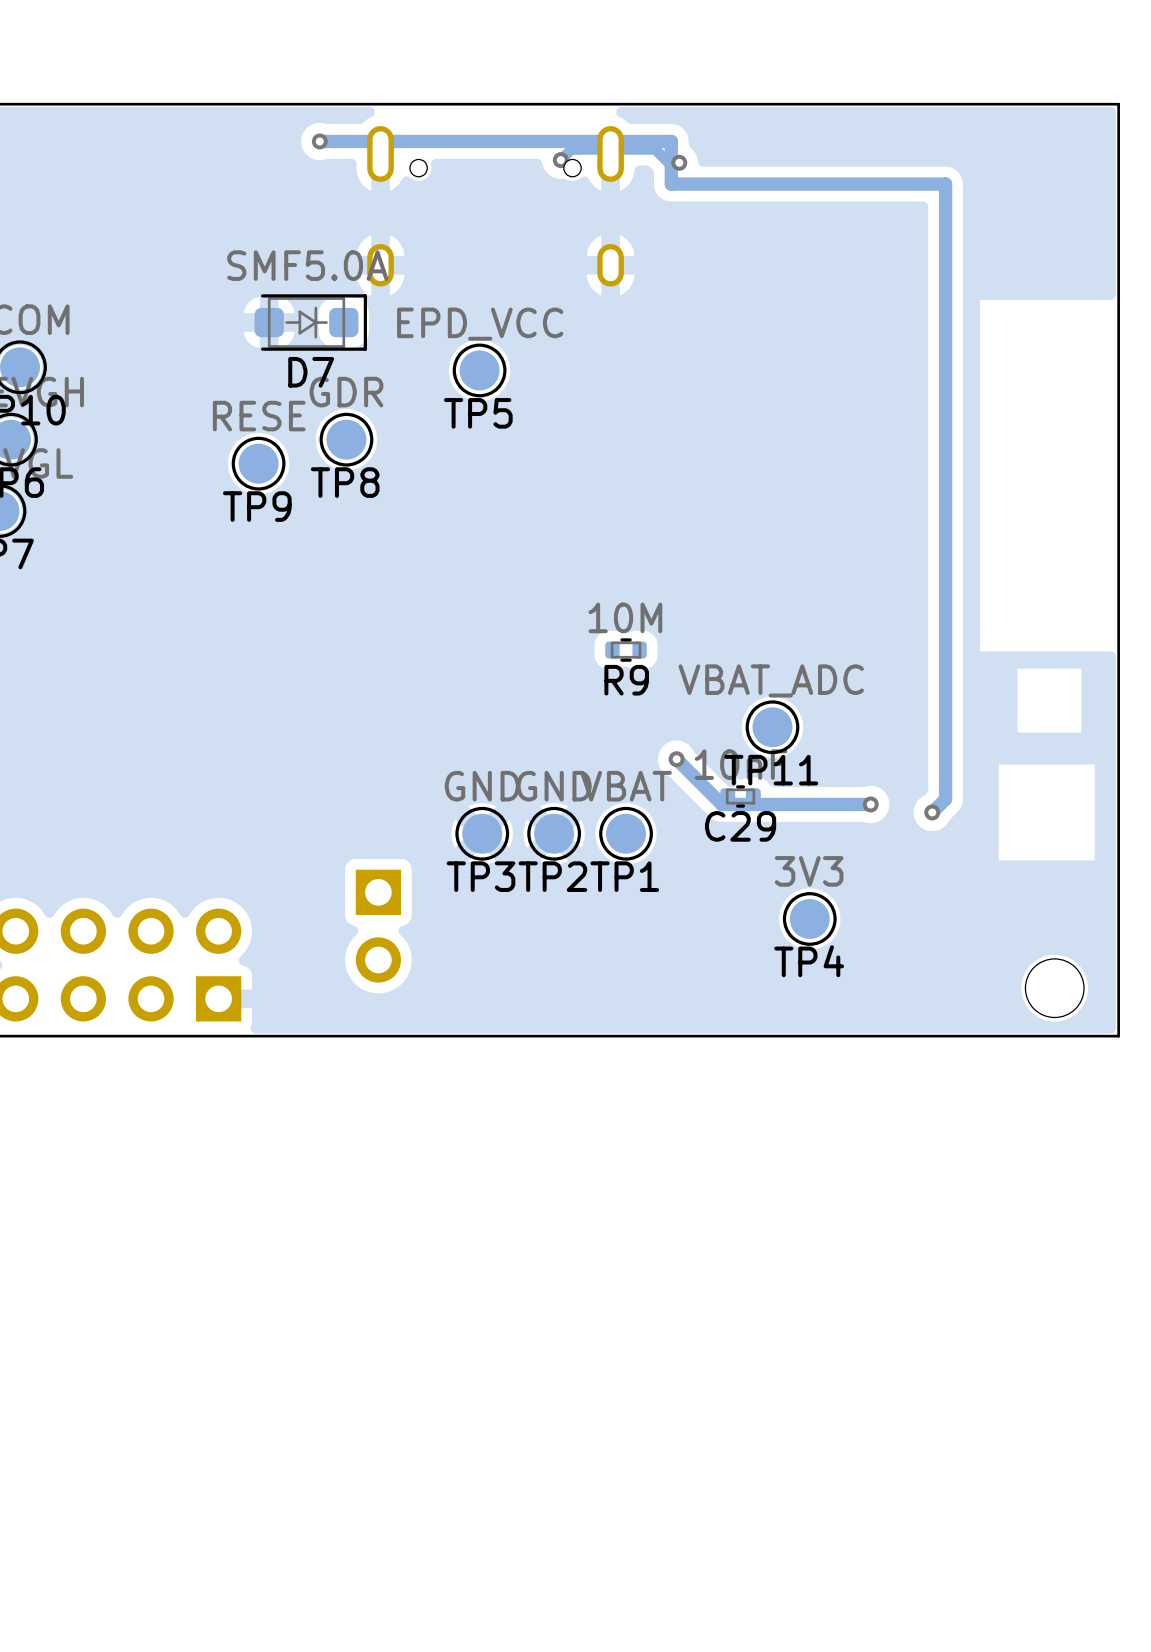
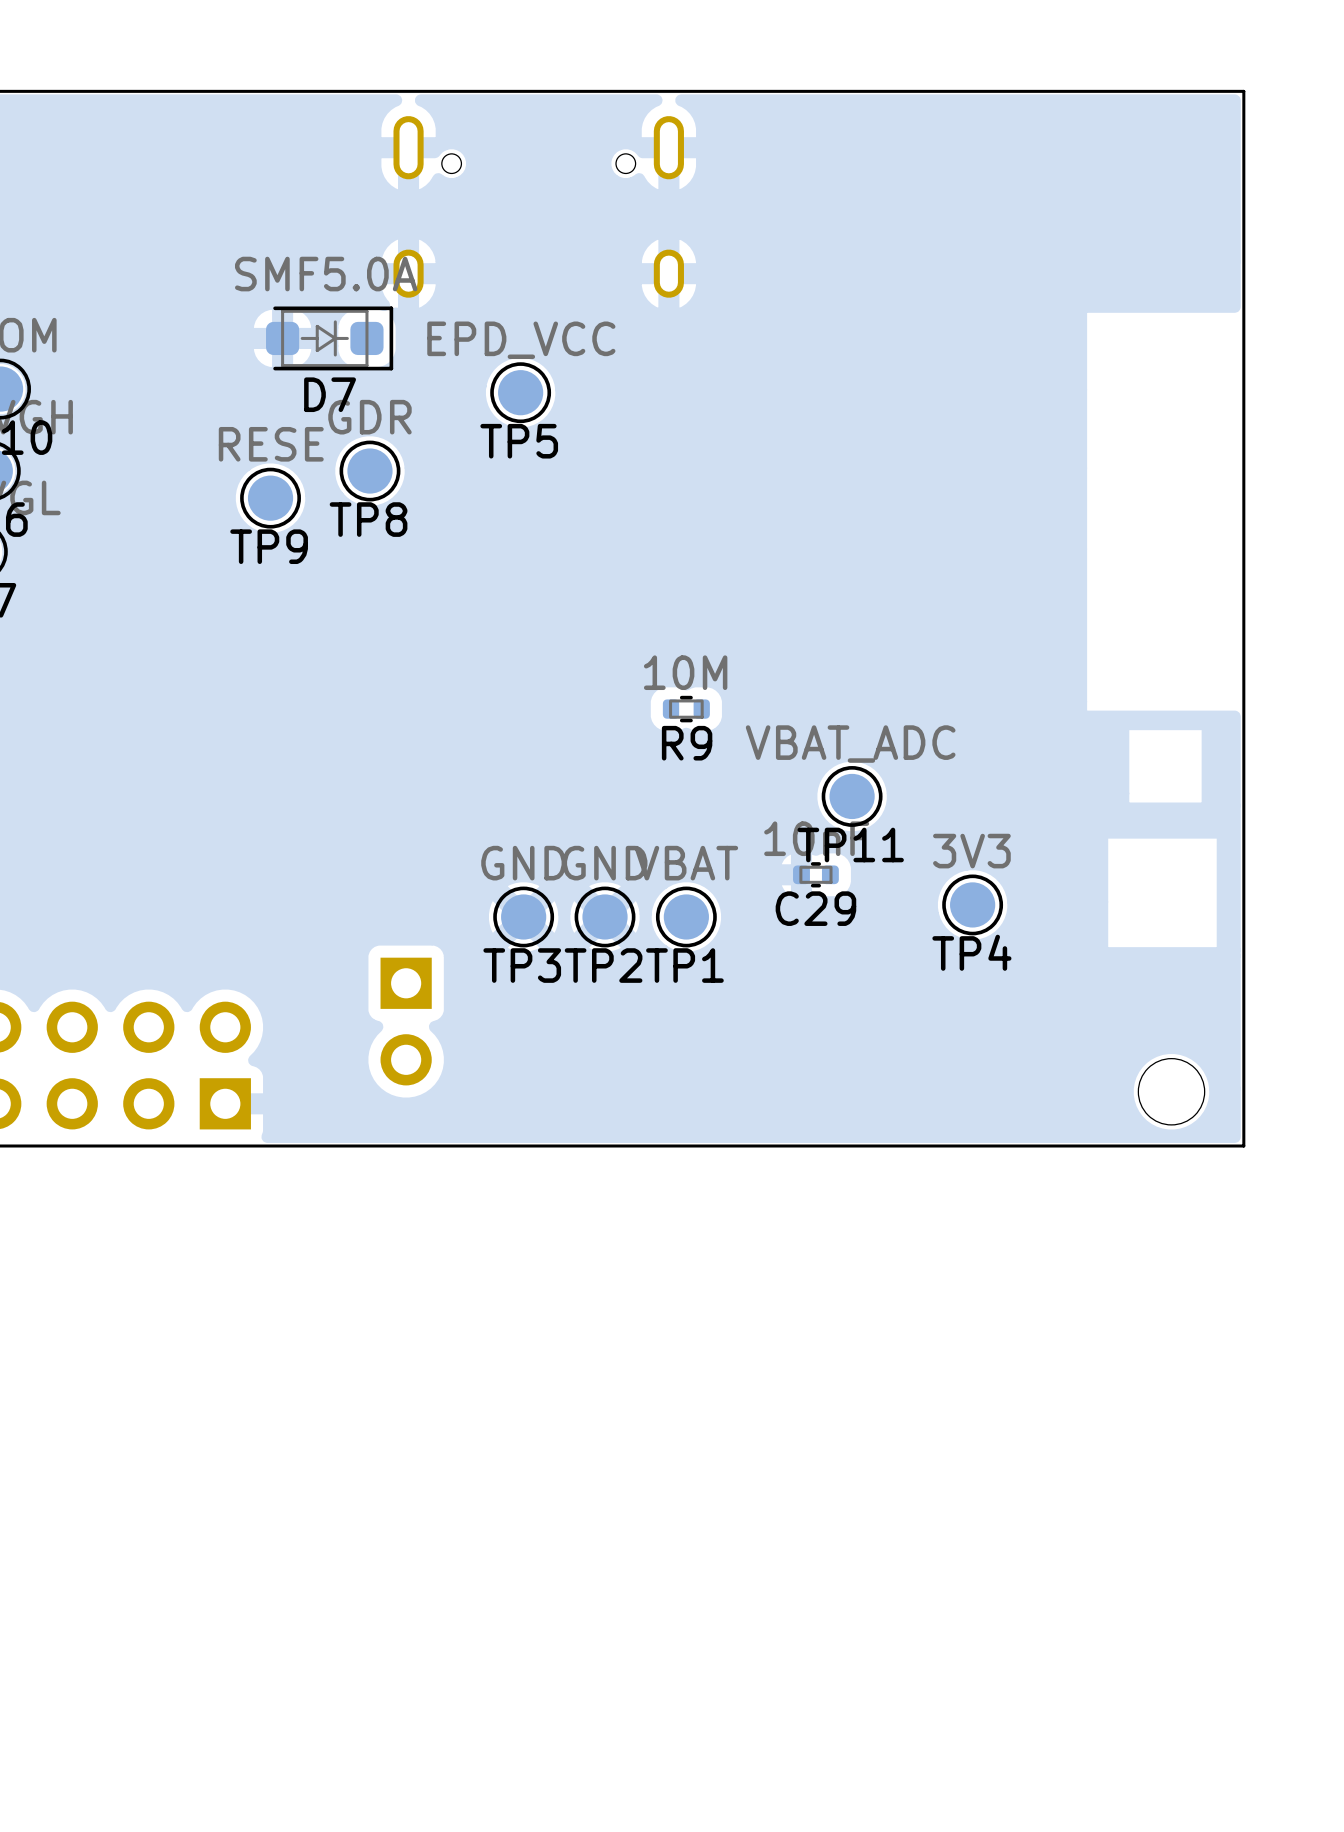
track: (319, 141) (671, 141) (671, 184) (945, 184) (945, 799) (932, 812) -> none
via: (319, 141) -> none
track: (560, 160) (571, 149) (655, 149) (668, 162) (679, 162) -> none
via: (560, 160) -> none
via: (679, 162) -> none
track: (676, 759) (721, 804) (870, 804) -> none
via: (676, 759) -> none
via: (870, 804) -> none
via: (932, 812) -> none
TP4 position: (809, 918) -> (972, 904)

